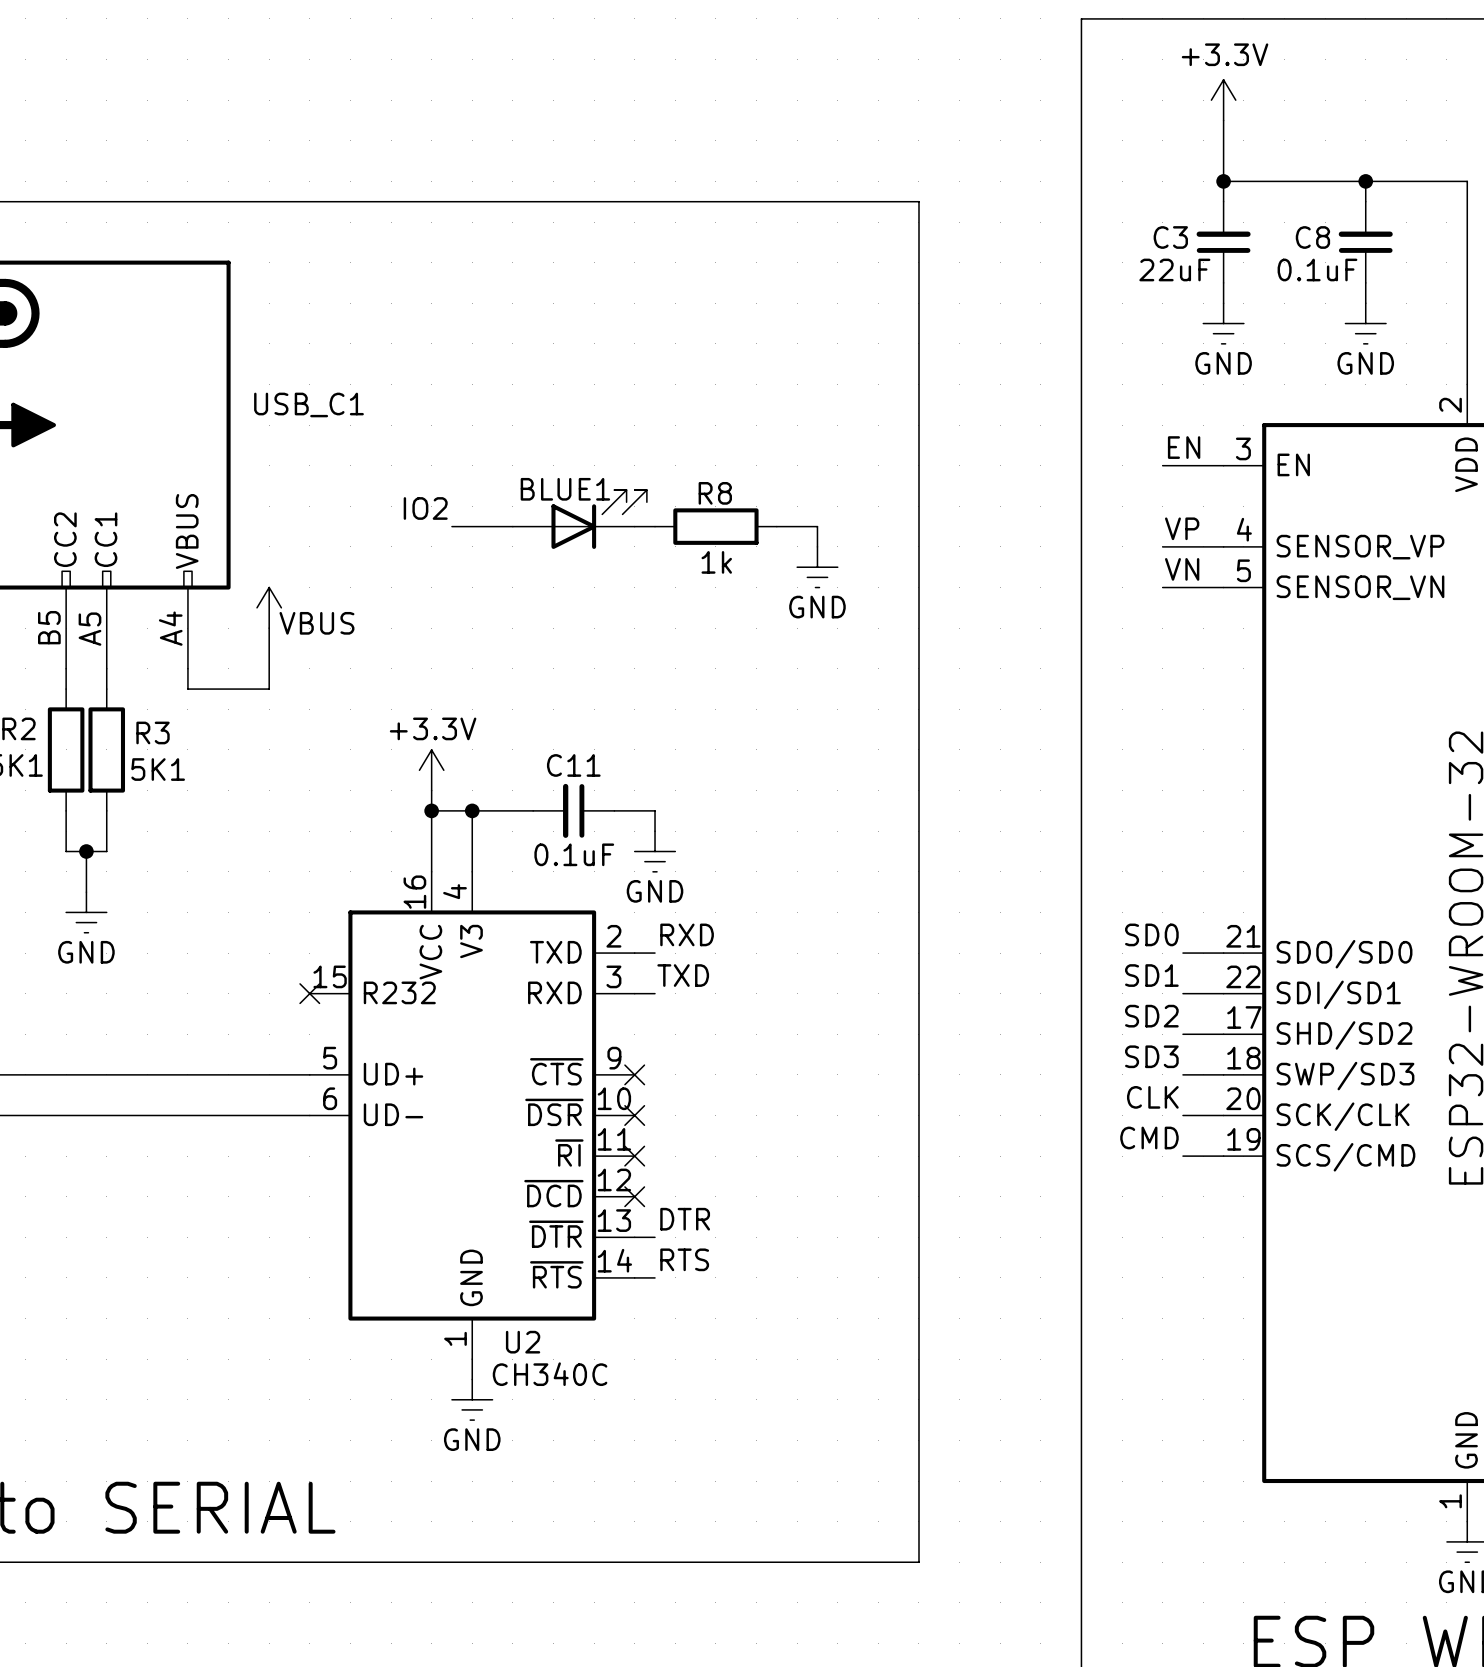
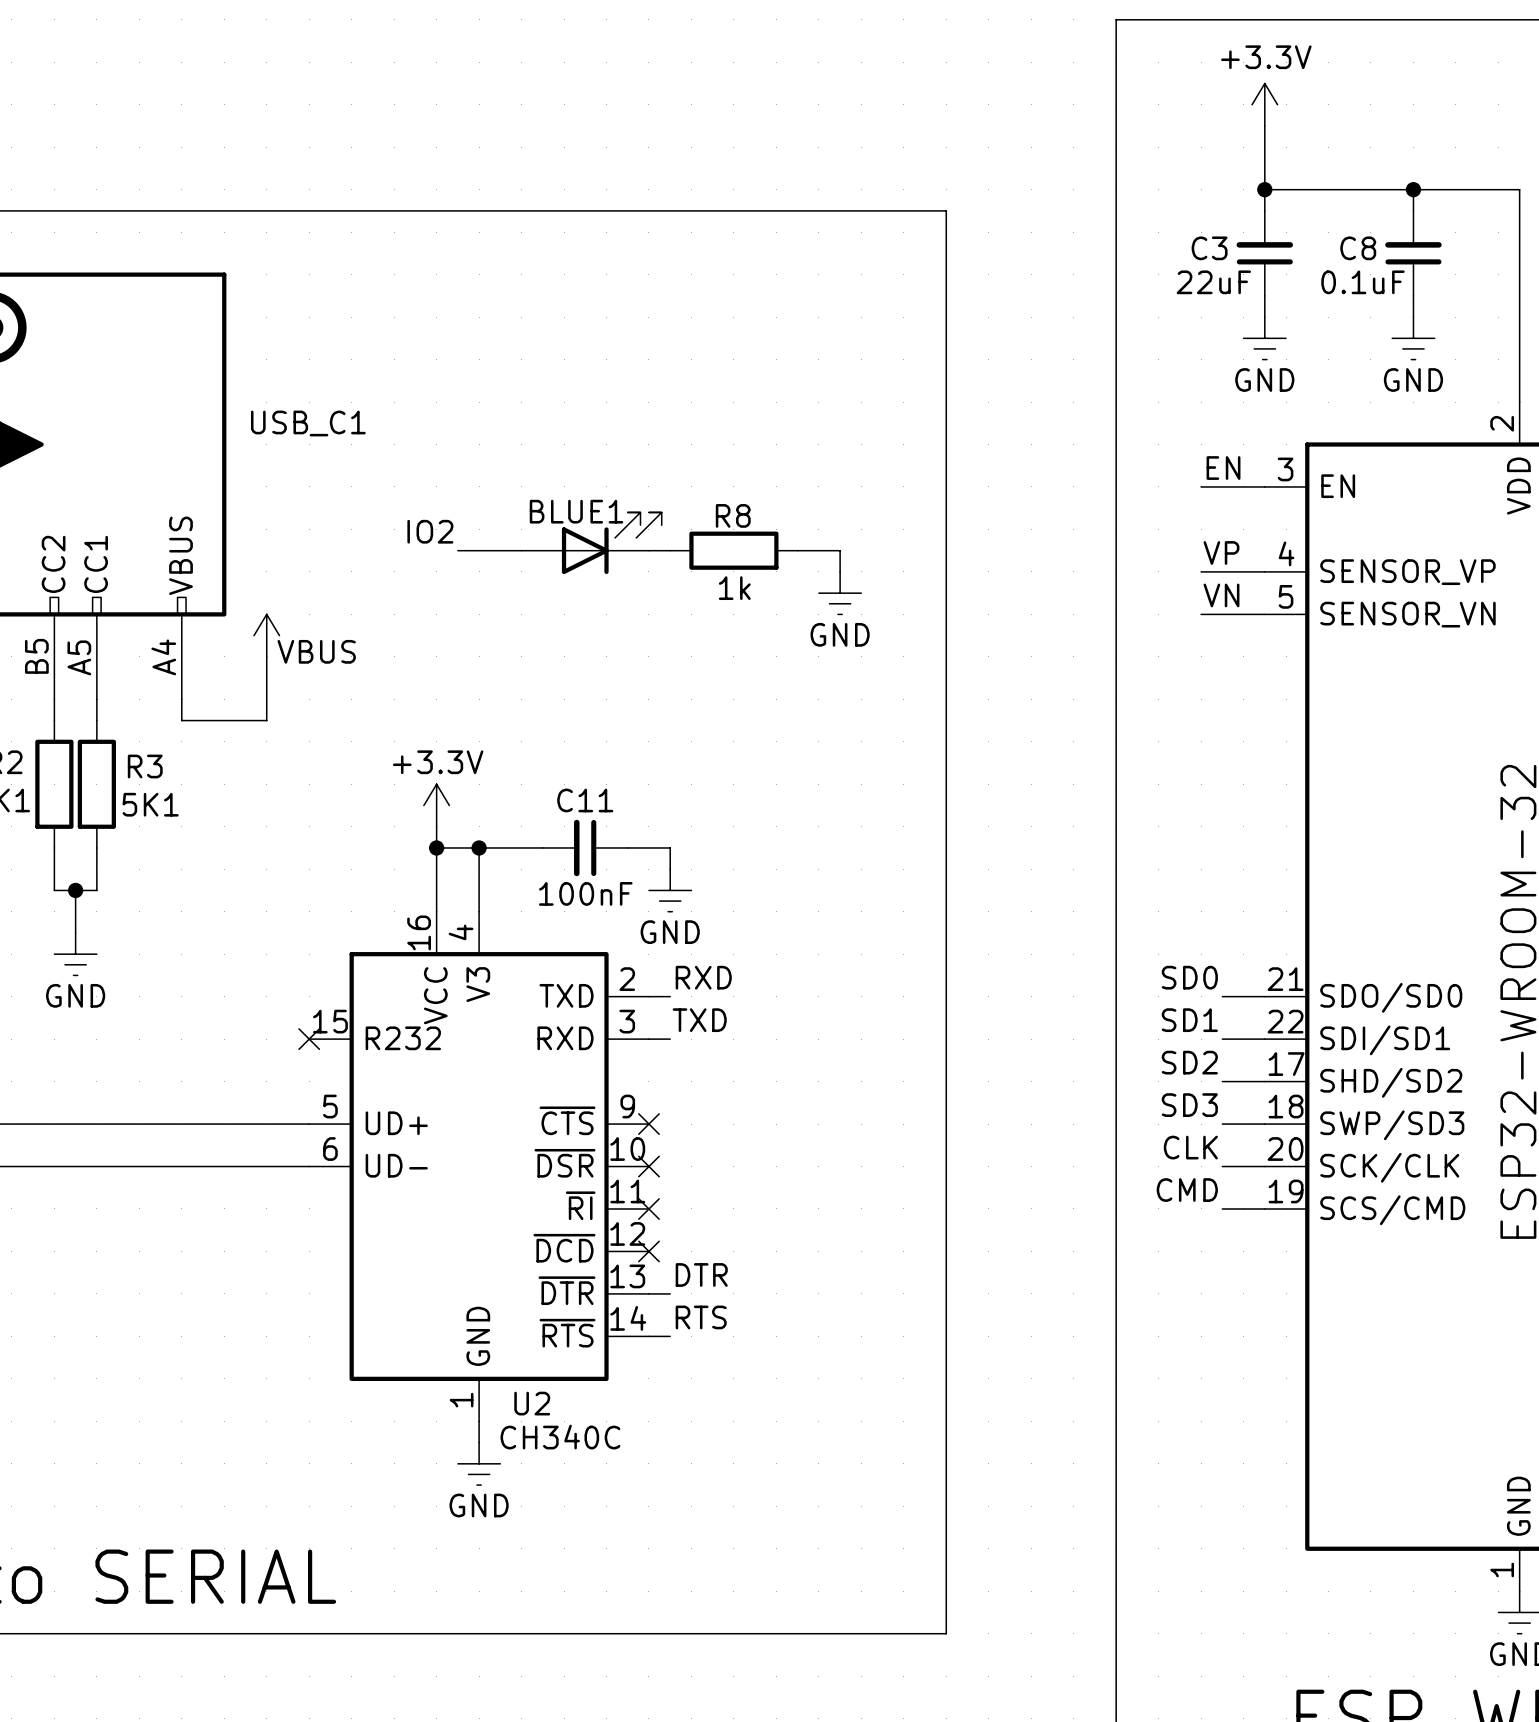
C11 value: 0.1uF (574, 854) -> 100nF (585, 893)

